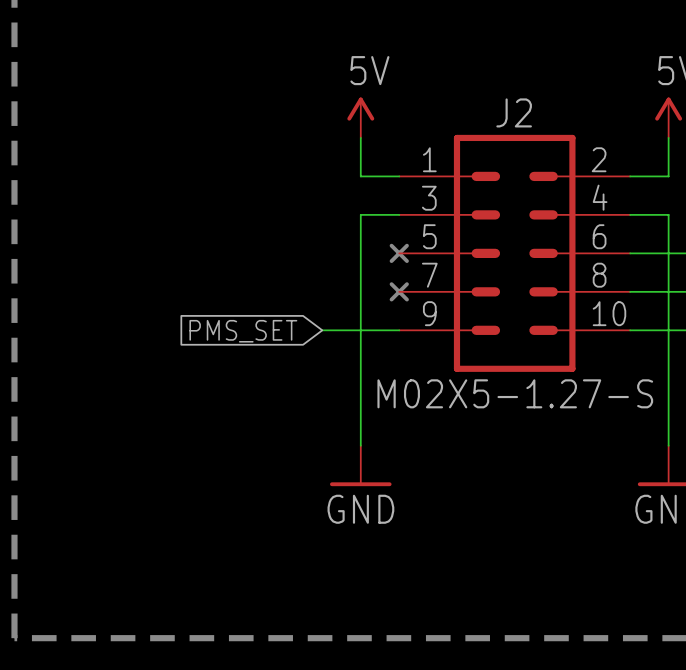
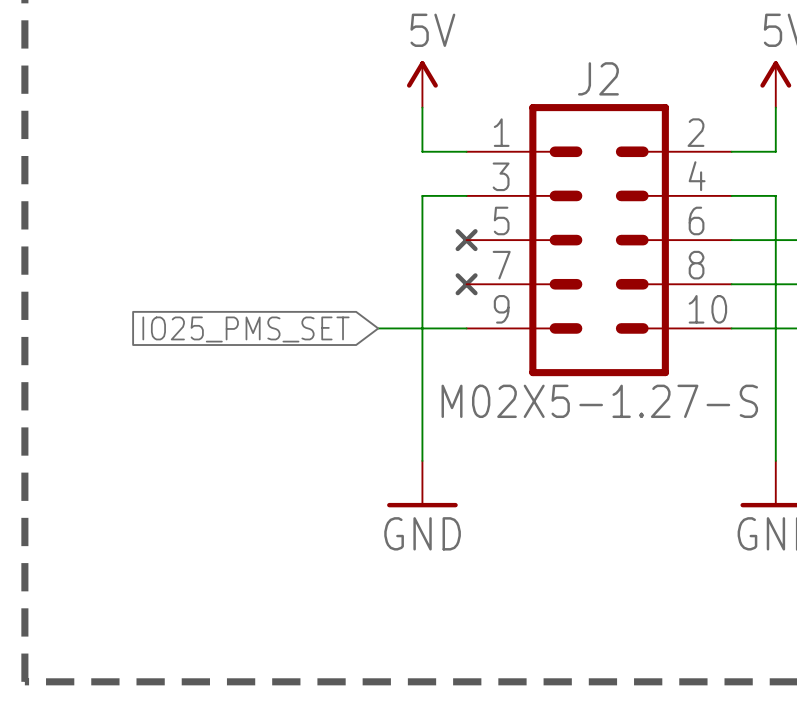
global label: PMS_SET (243, 331) -> IO25_PMS_SET (246, 329)

